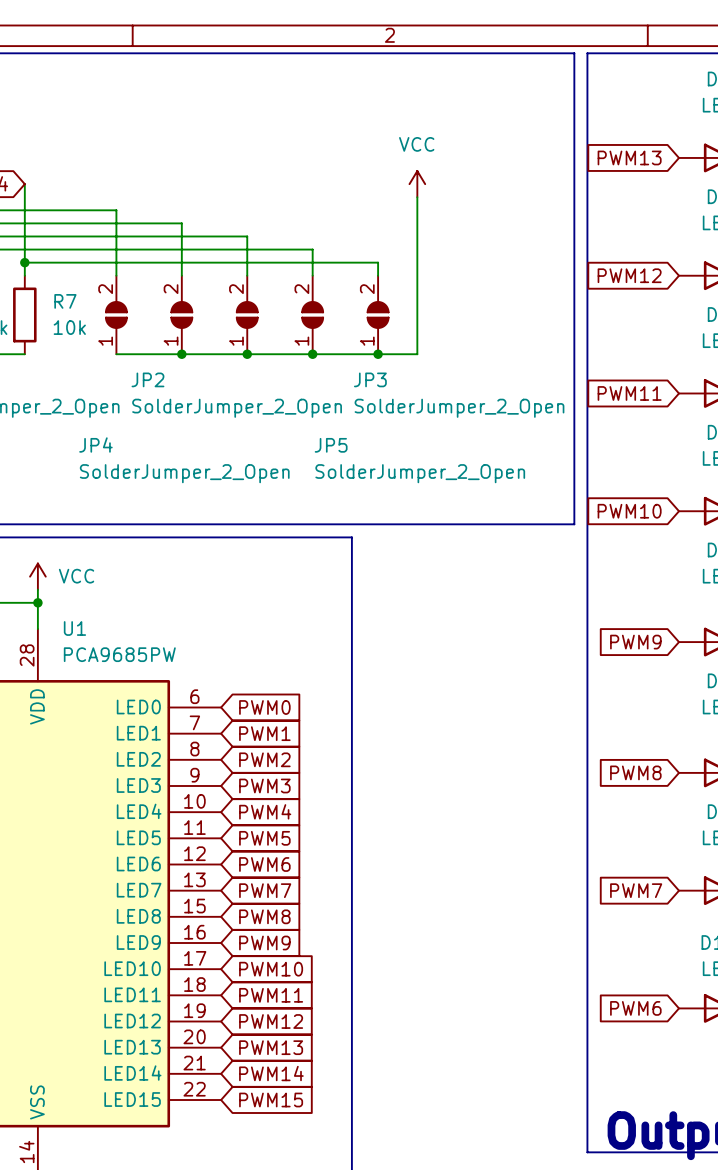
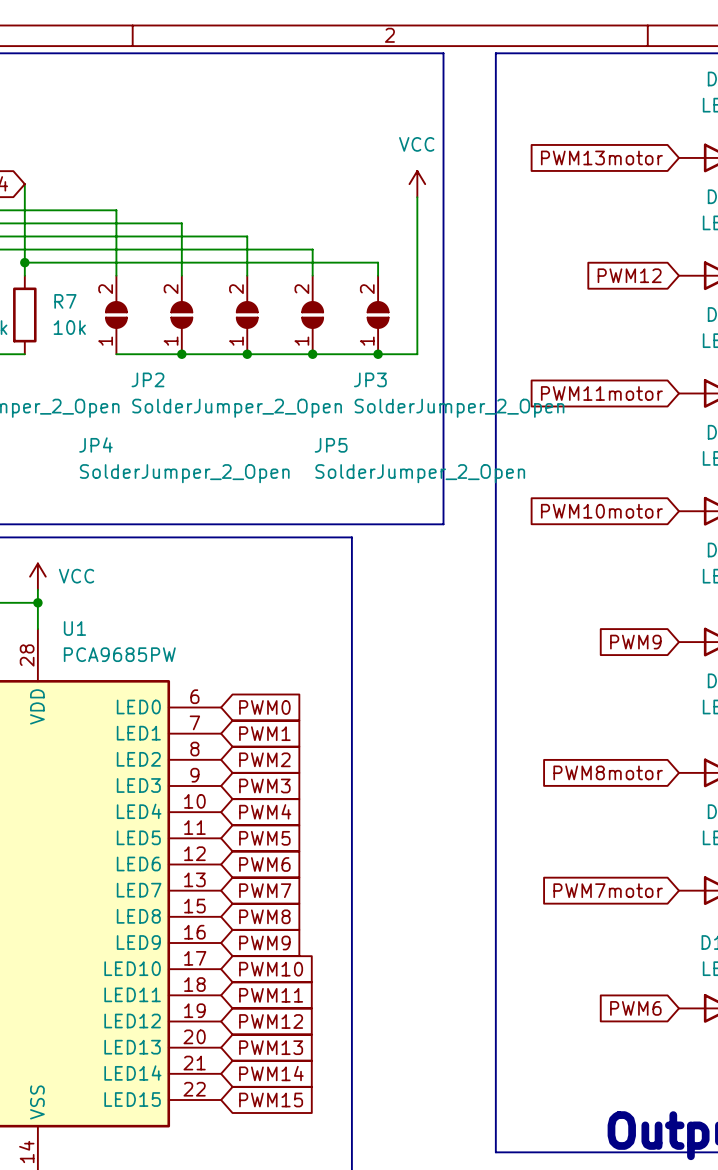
line: (443, 53) (495, 53) -> none
line: (574, 53) (574, 524) (443, 524) -> (443, 53) (443, 524)
line: none -> (574, 53) (587, 53)
line: (587, 53) (587, 1152) -> (495, 53) (495, 1152) (587, 1152)
global label: PWM13 (629, 157) -> PWM13motor (601, 157)
global label: PWM11 (629, 393) -> PWM11motor (601, 393)
global label: PWM10 (629, 511) -> PWM10motor (601, 511)
global label: PWM8 (635, 772) -> PWM8motor (608, 772)
global label: PWM7 (636, 890) -> PWM7motor (608, 890)

